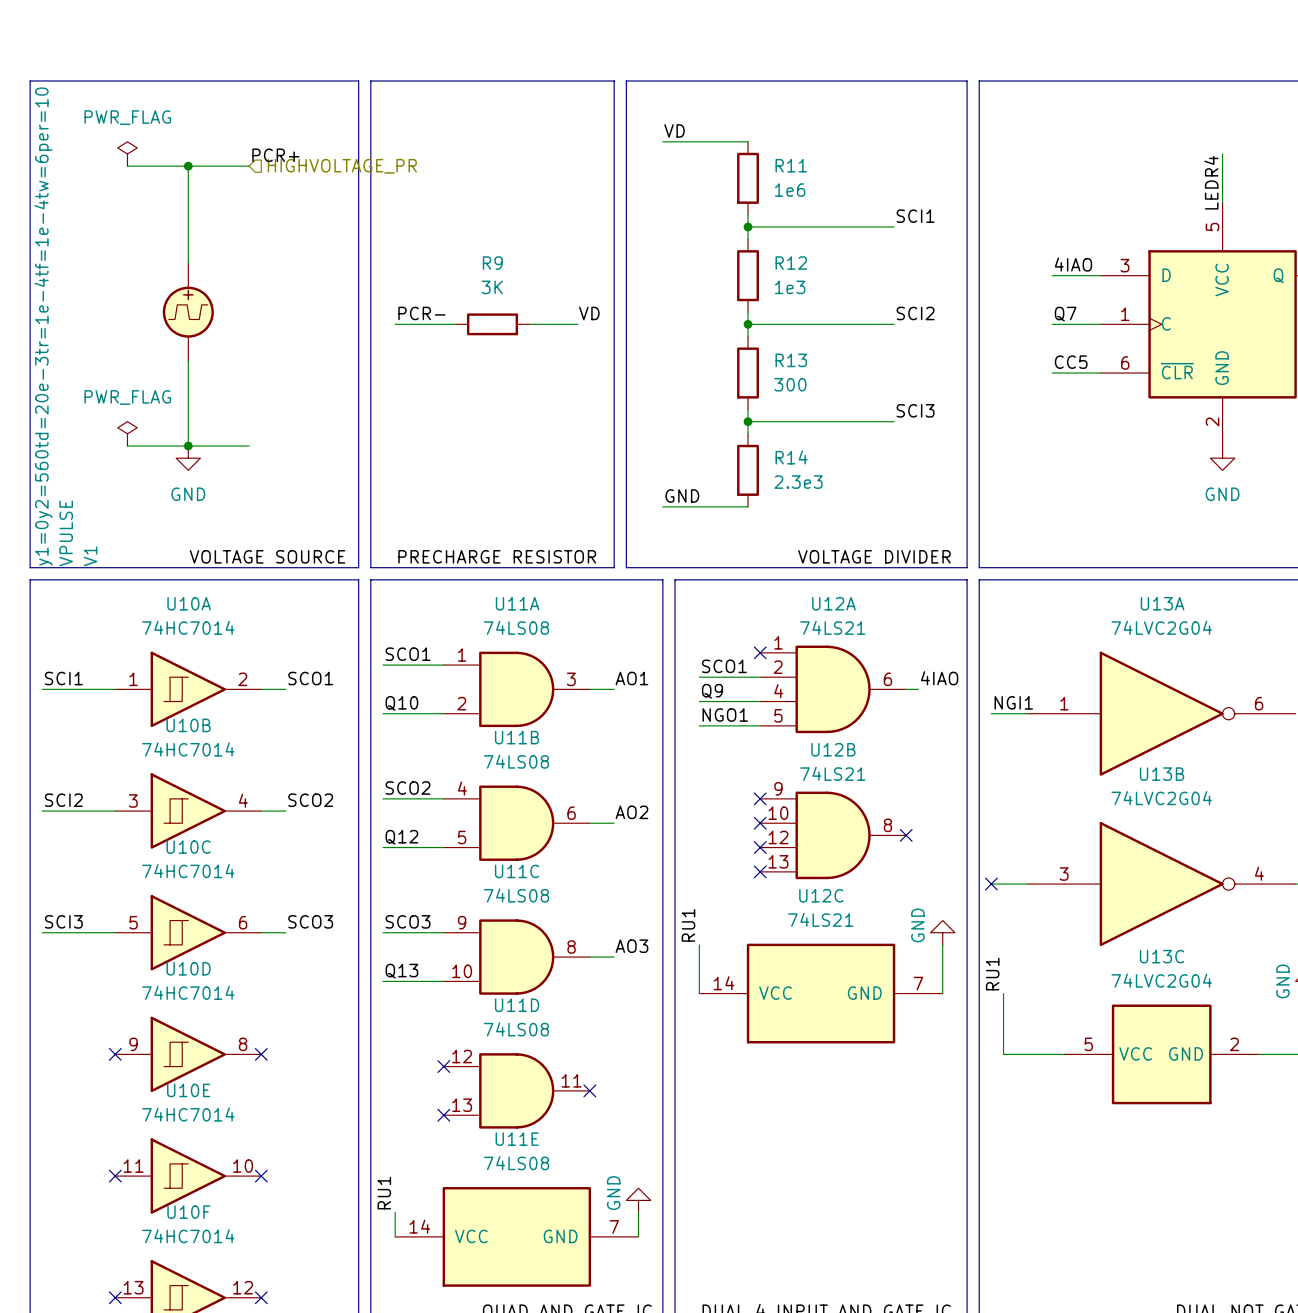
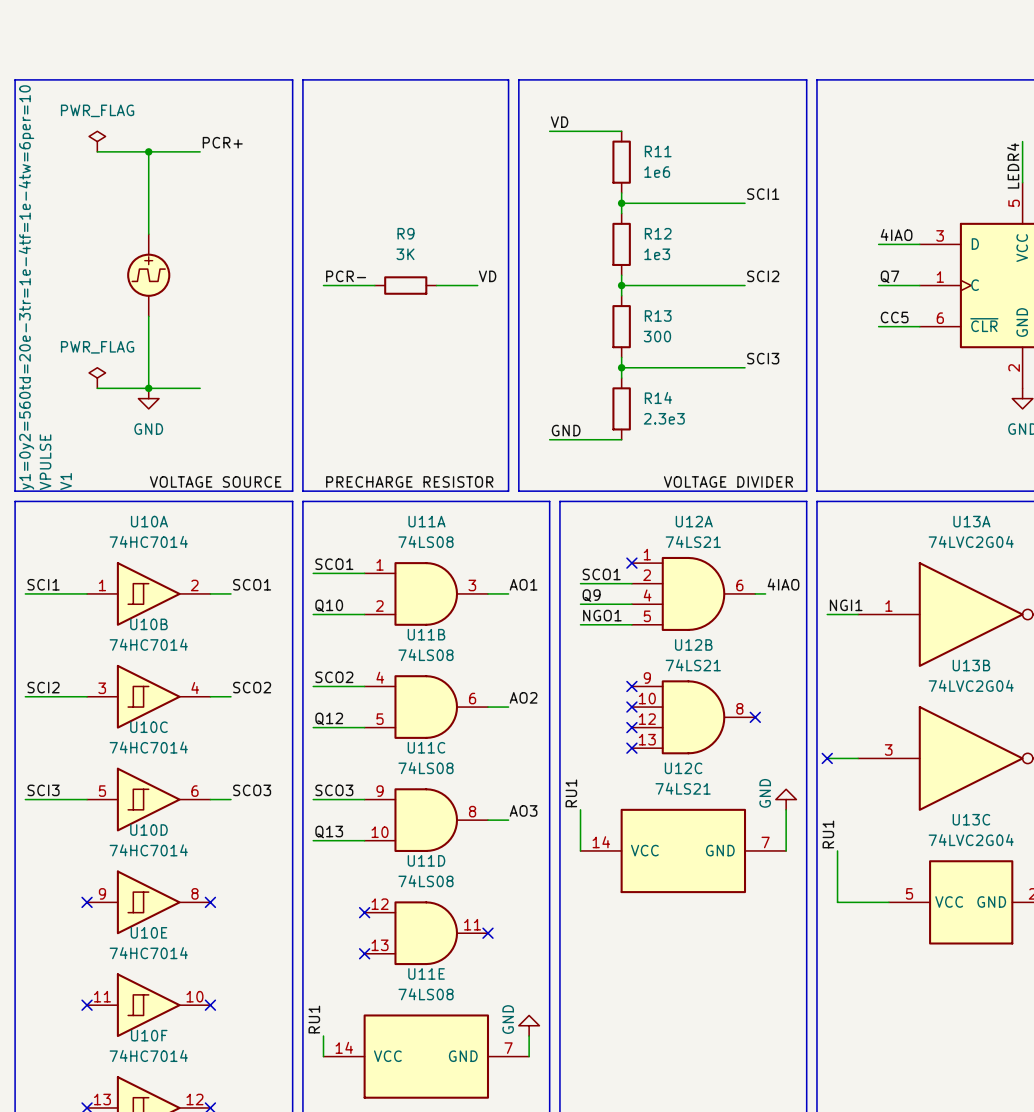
hierarchical label: HIGHVOLTAGE_PR (342, 166) -> none

